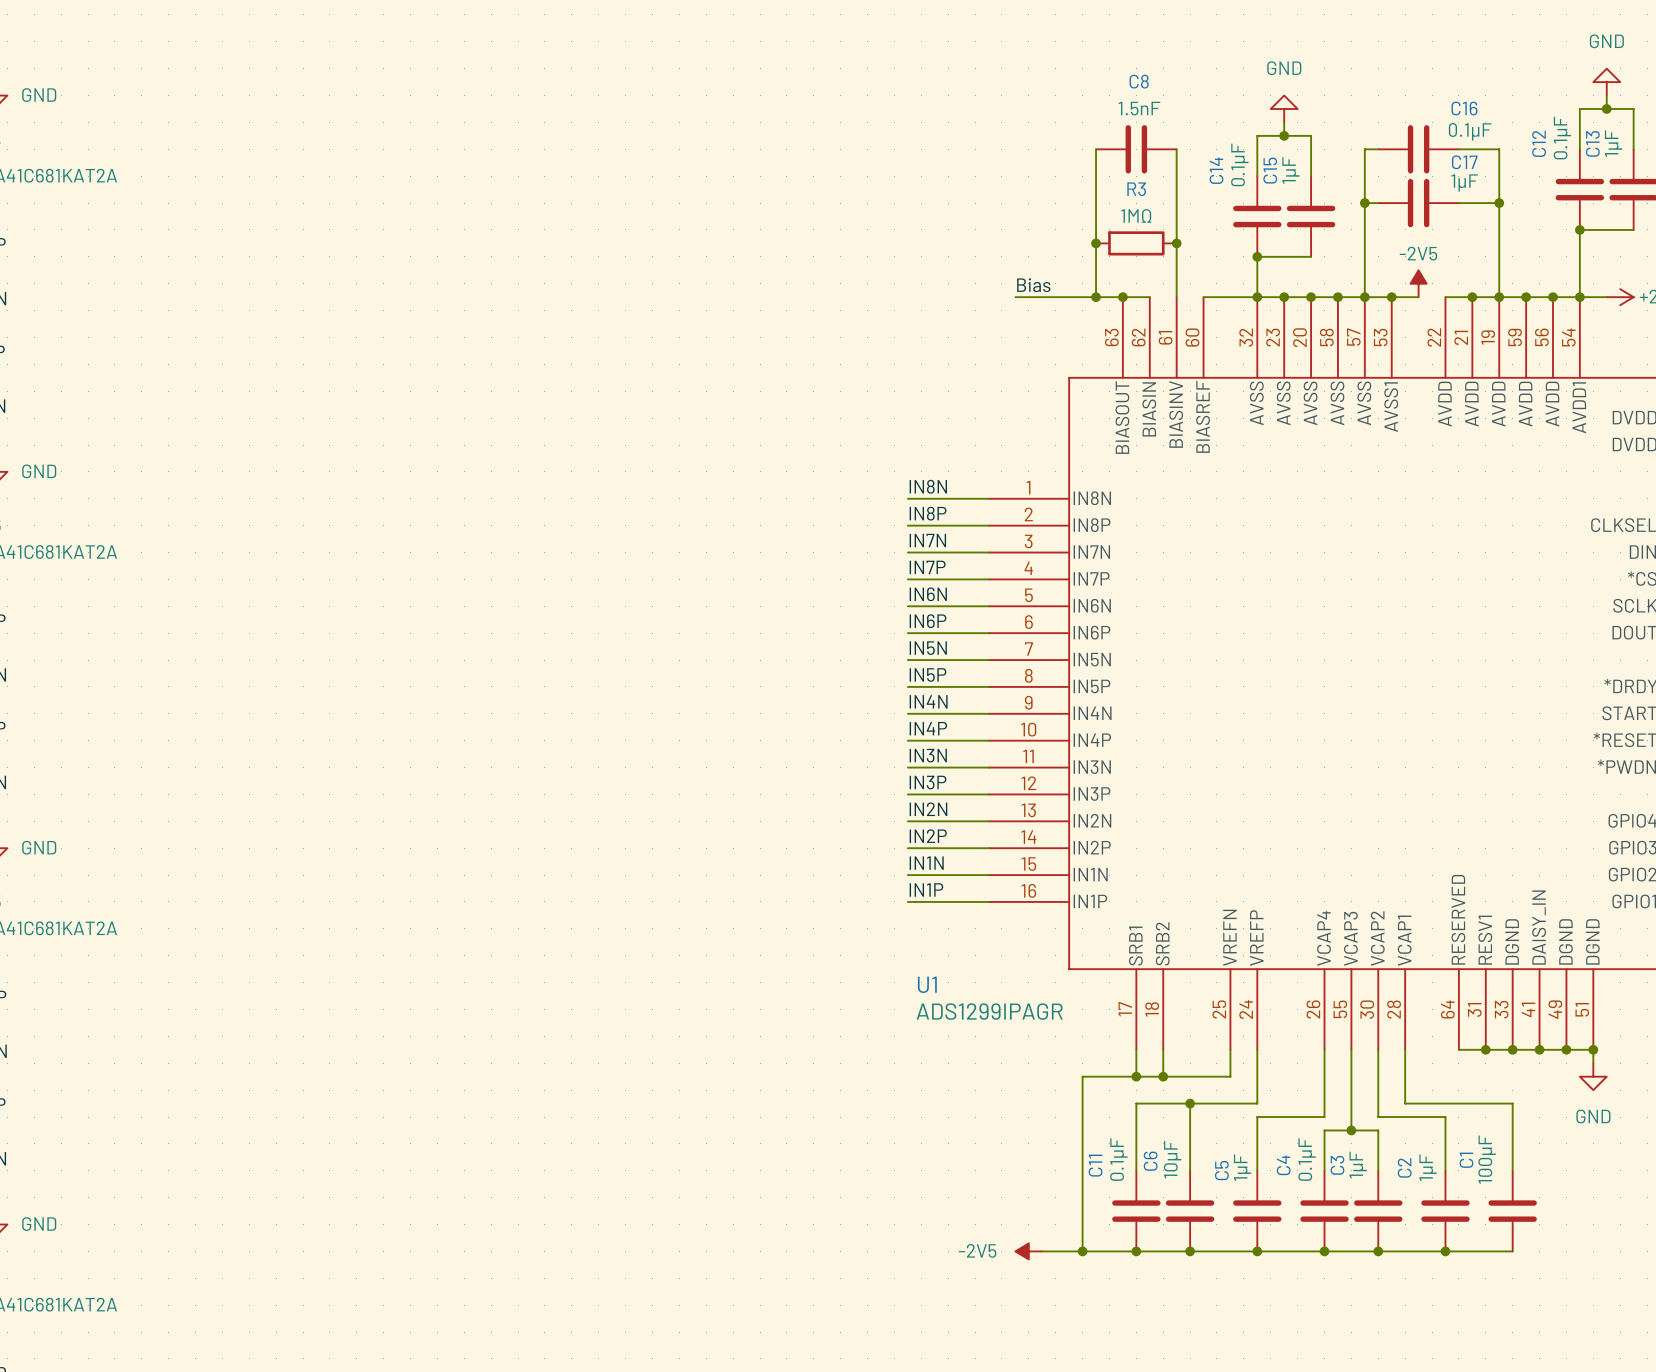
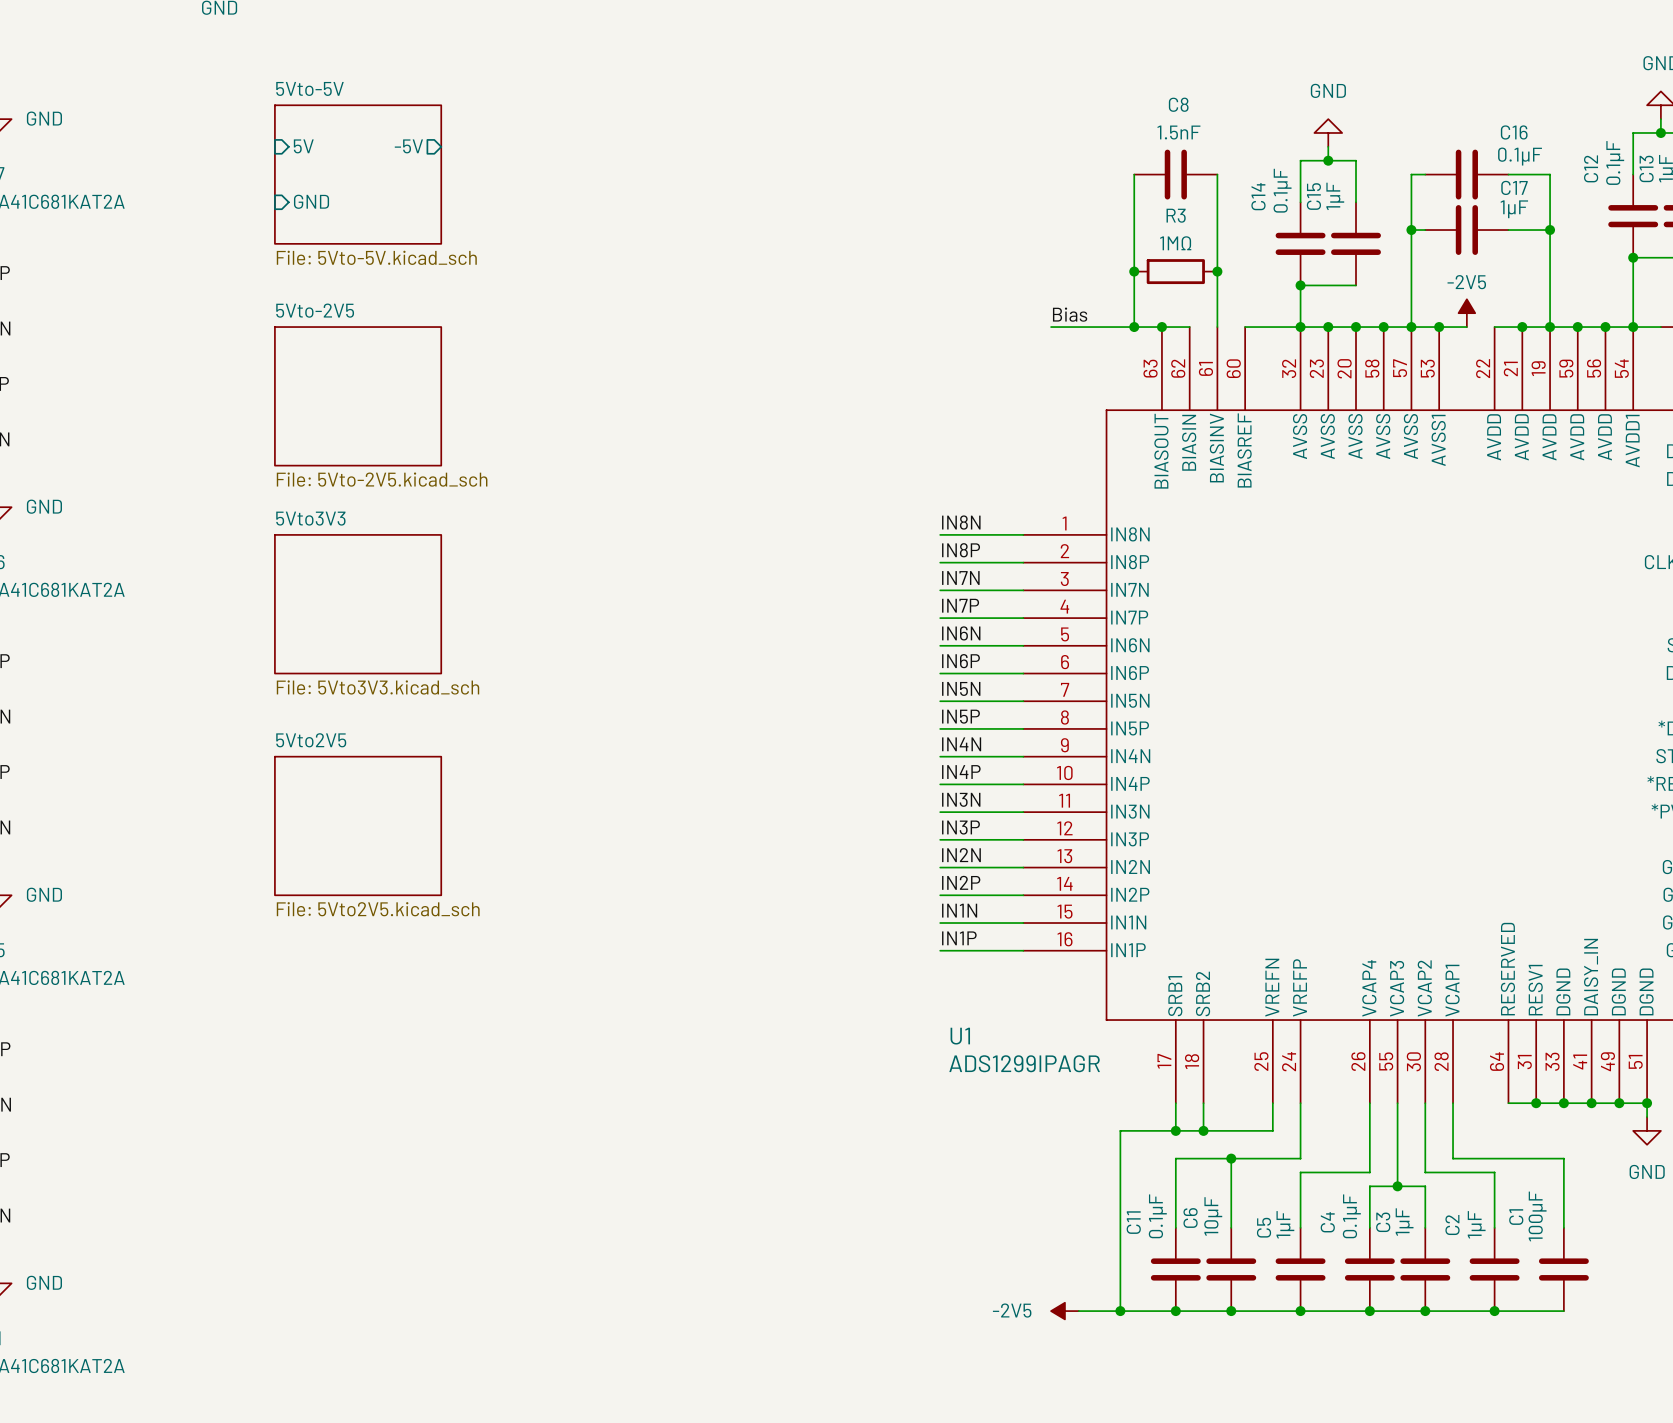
sheet pin: none -> 5V (303, 146)
sheet pin: none -> -5V (408, 146)
sheet 5Vto-5V: none -> File: 5Vto-5V.kicad_sch (358, 174)
sheet pin: none -> GND (311, 201)
sheet 5Vto-2V5: none -> File: 5Vto-2V5.kicad_sch (358, 396)
sheet 5Vto3V3: none -> File: 5Vto3V3.kicad_sch (358, 604)
sheet 5Vto2V5: none -> File: 5Vto2V5.kicad_sch (358, 825)

